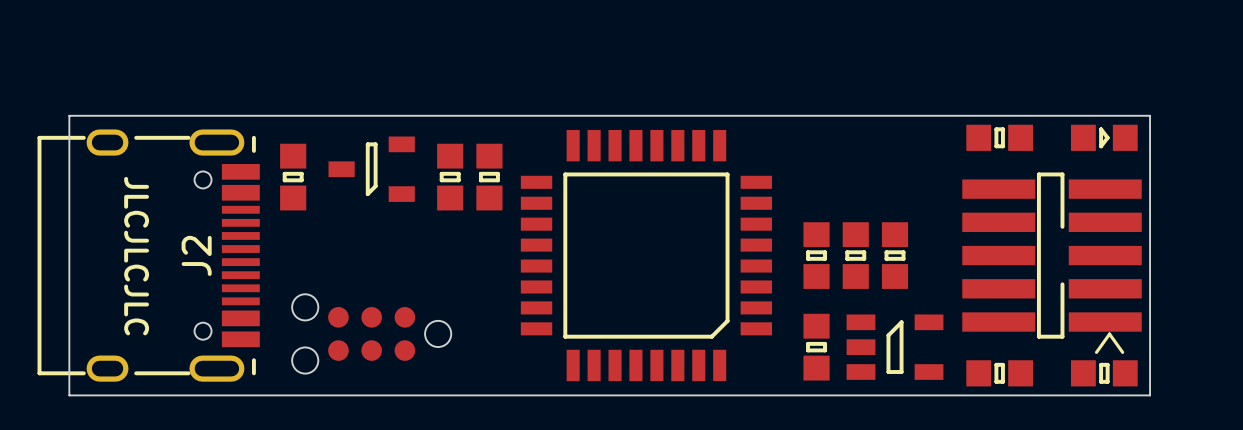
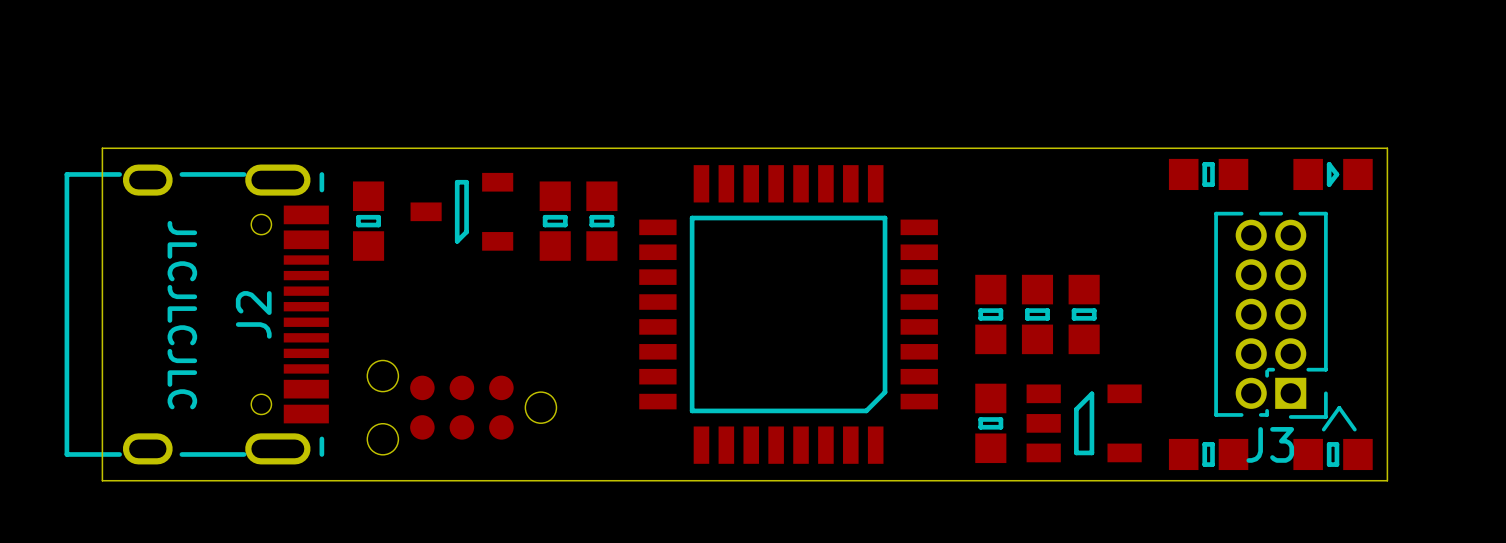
part: (1052, 255) -> none
J3: none -> (1270, 315)

